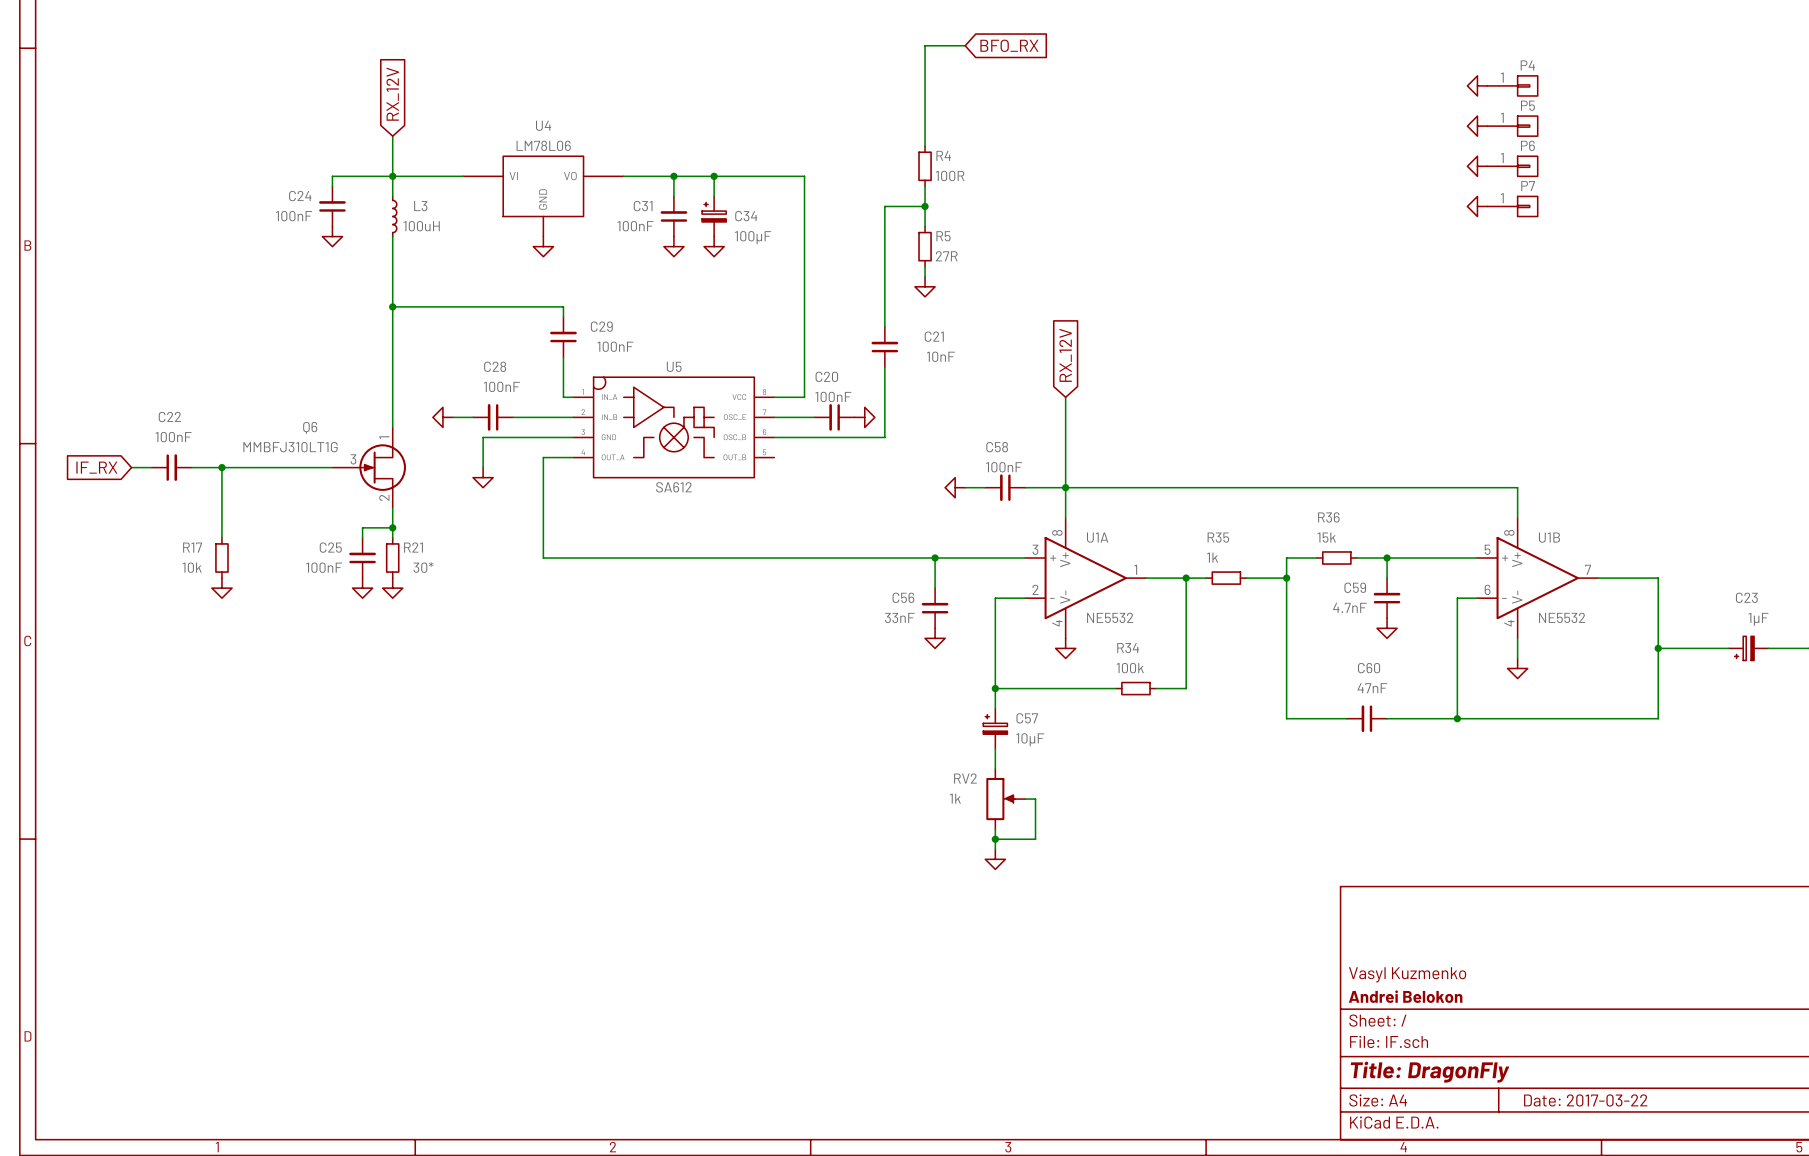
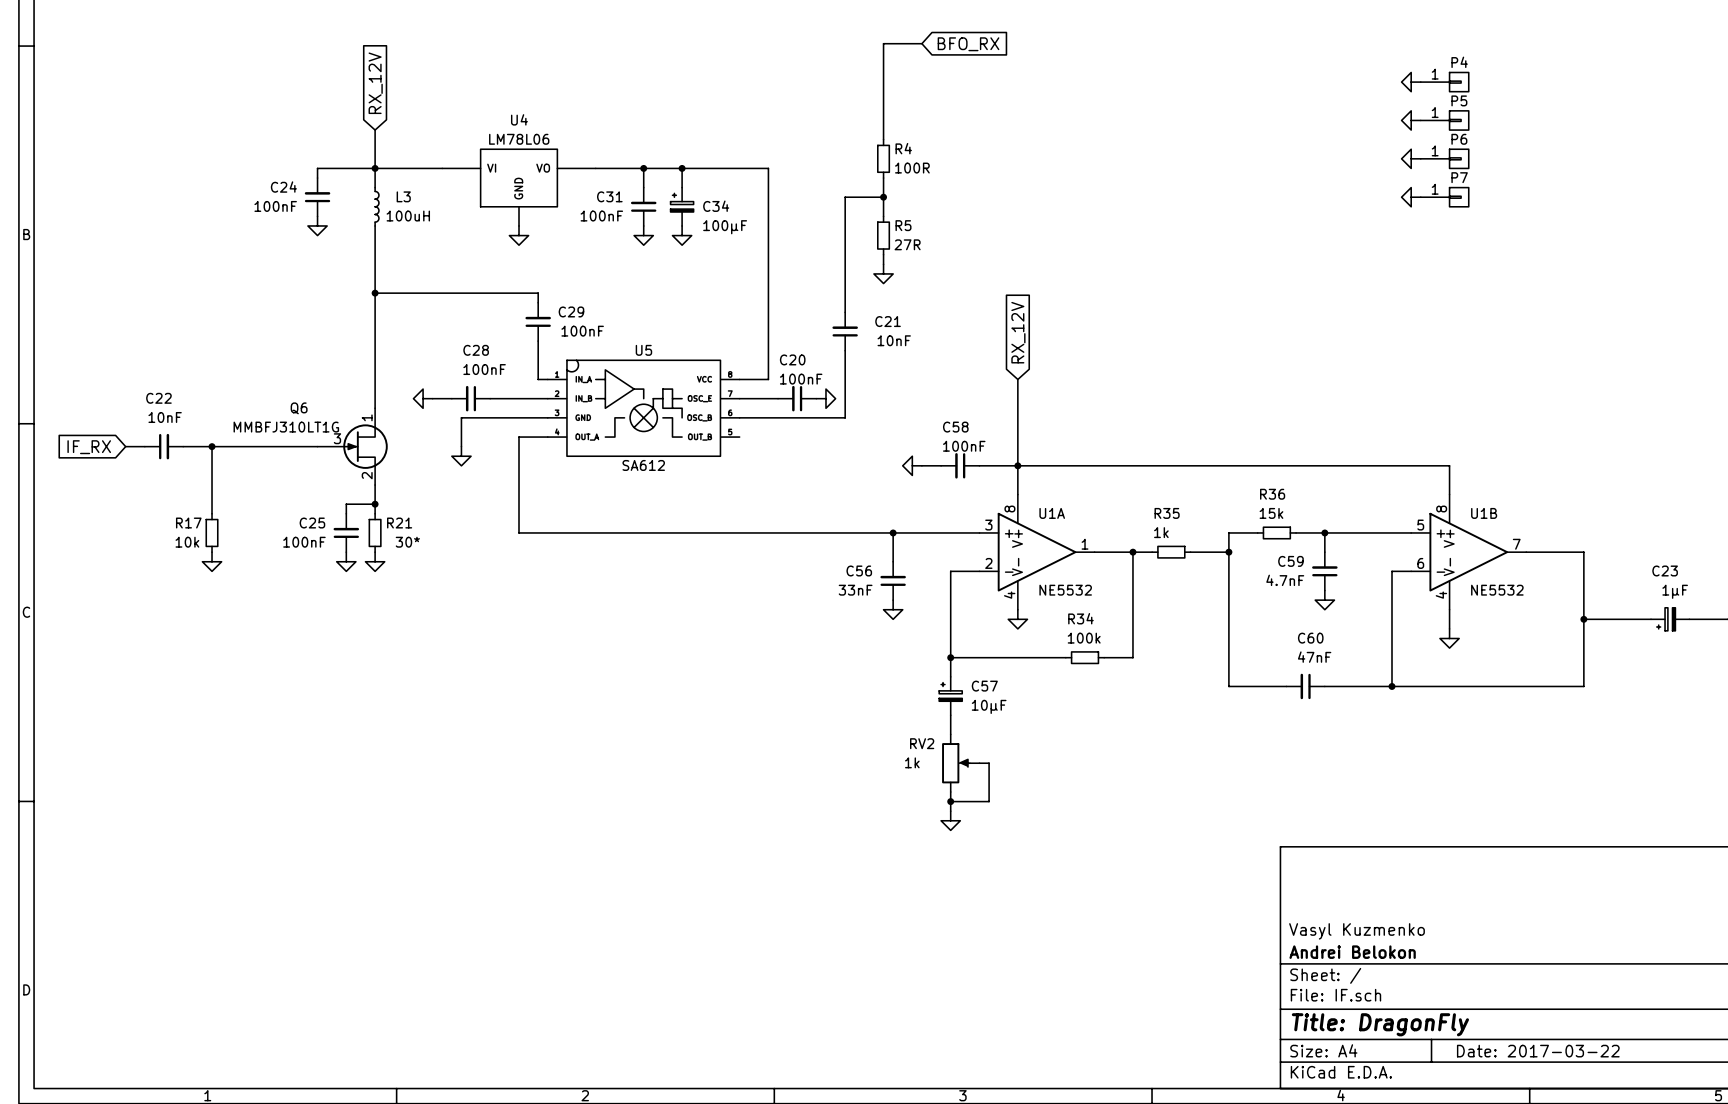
C22 value: 100nF (173, 437) -> 10nF (165, 417)

